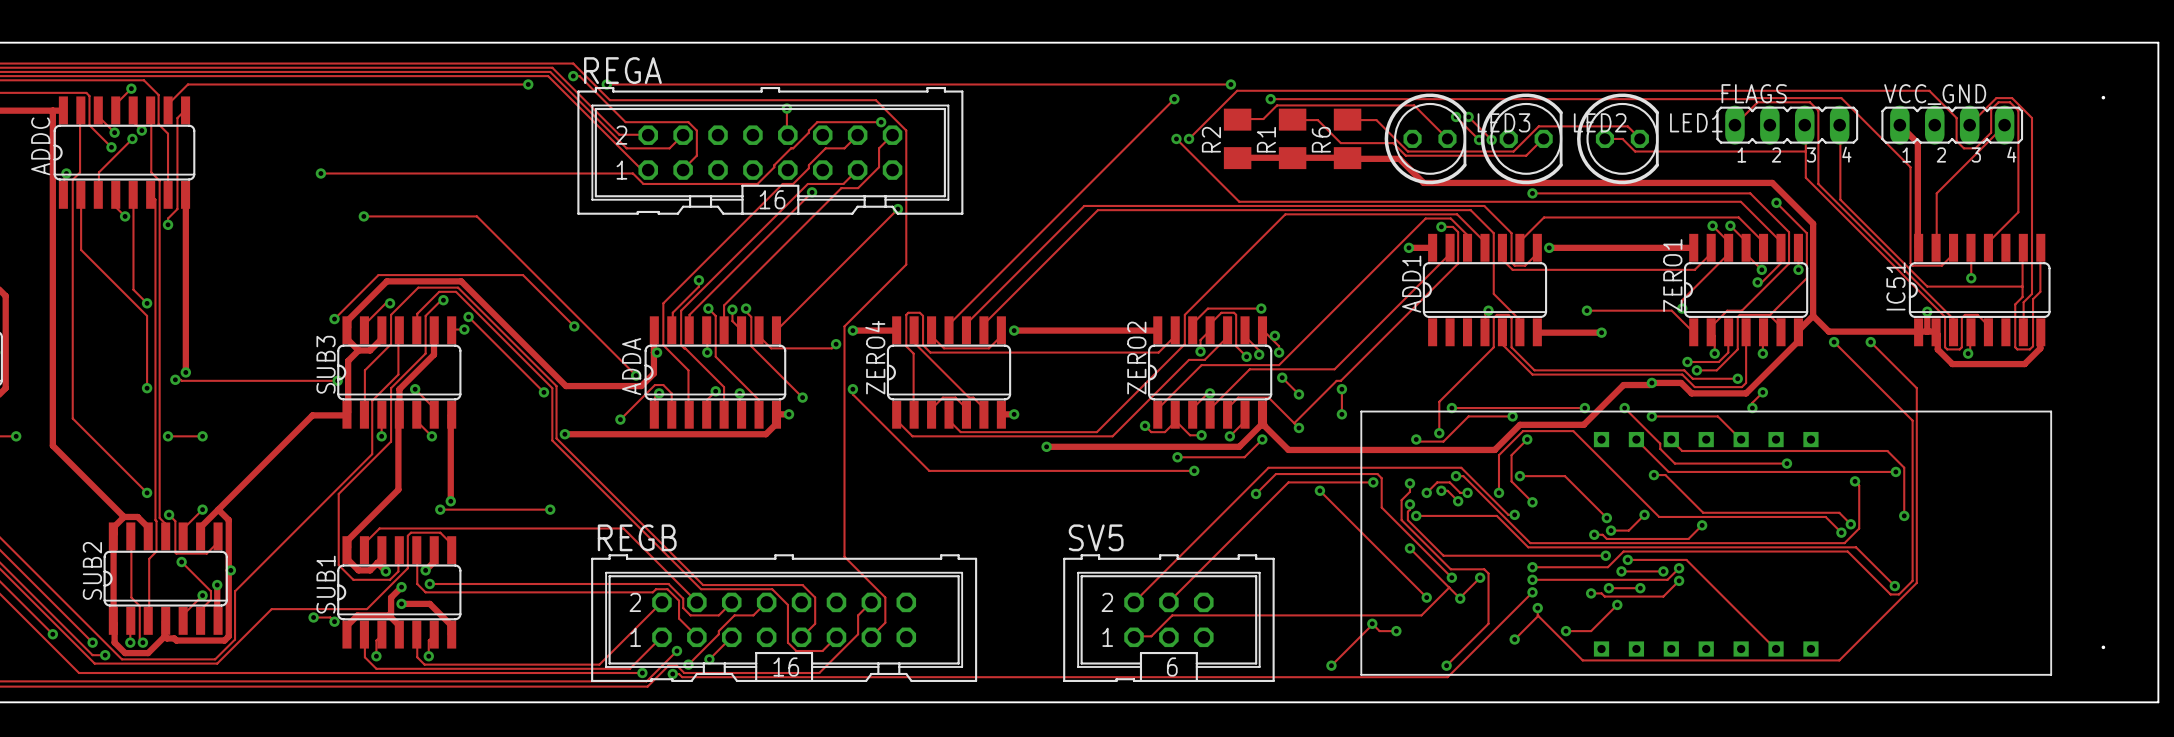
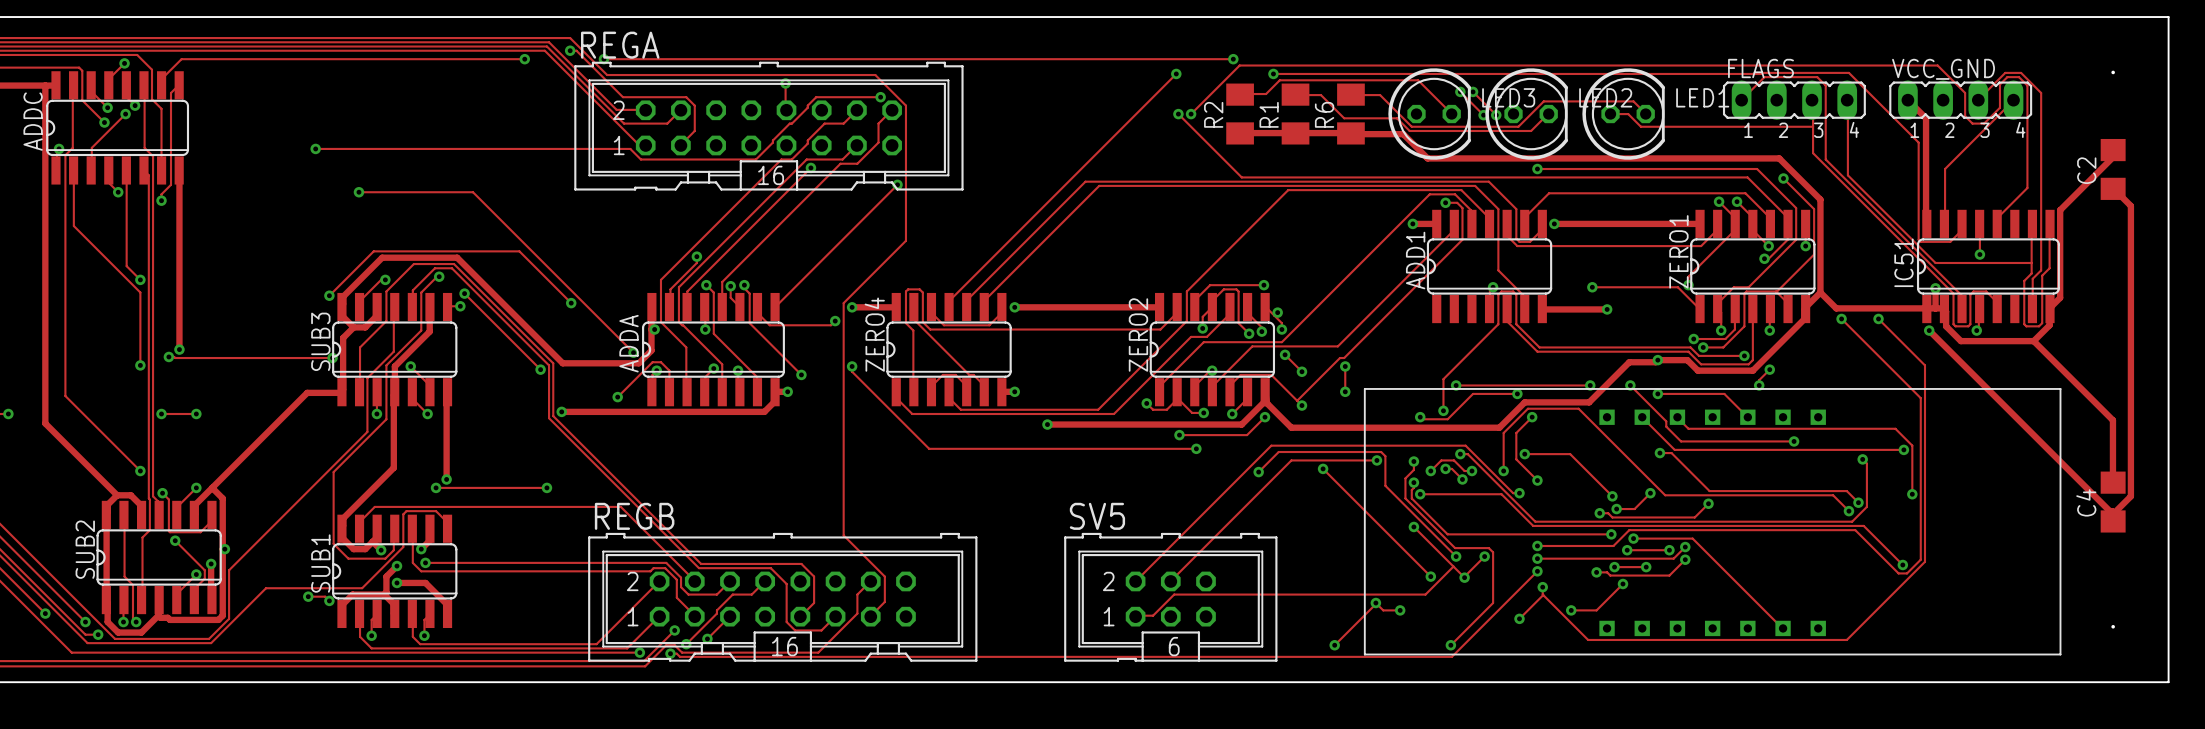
track: none -> (2113, 150) (2112, 157) (2060, 210) (2060, 297) (2050, 309)
C2: none -> (2113, 169)
track: none -> (2113, 188) (2130, 205) (2130, 496) (2114, 513) (2113, 521) (2111, 511) (1929, 330)
via: none -> (1929, 330)
track: none -> (2033, 341) (2112, 420) (2112, 482)
C4: none -> (2113, 502)

